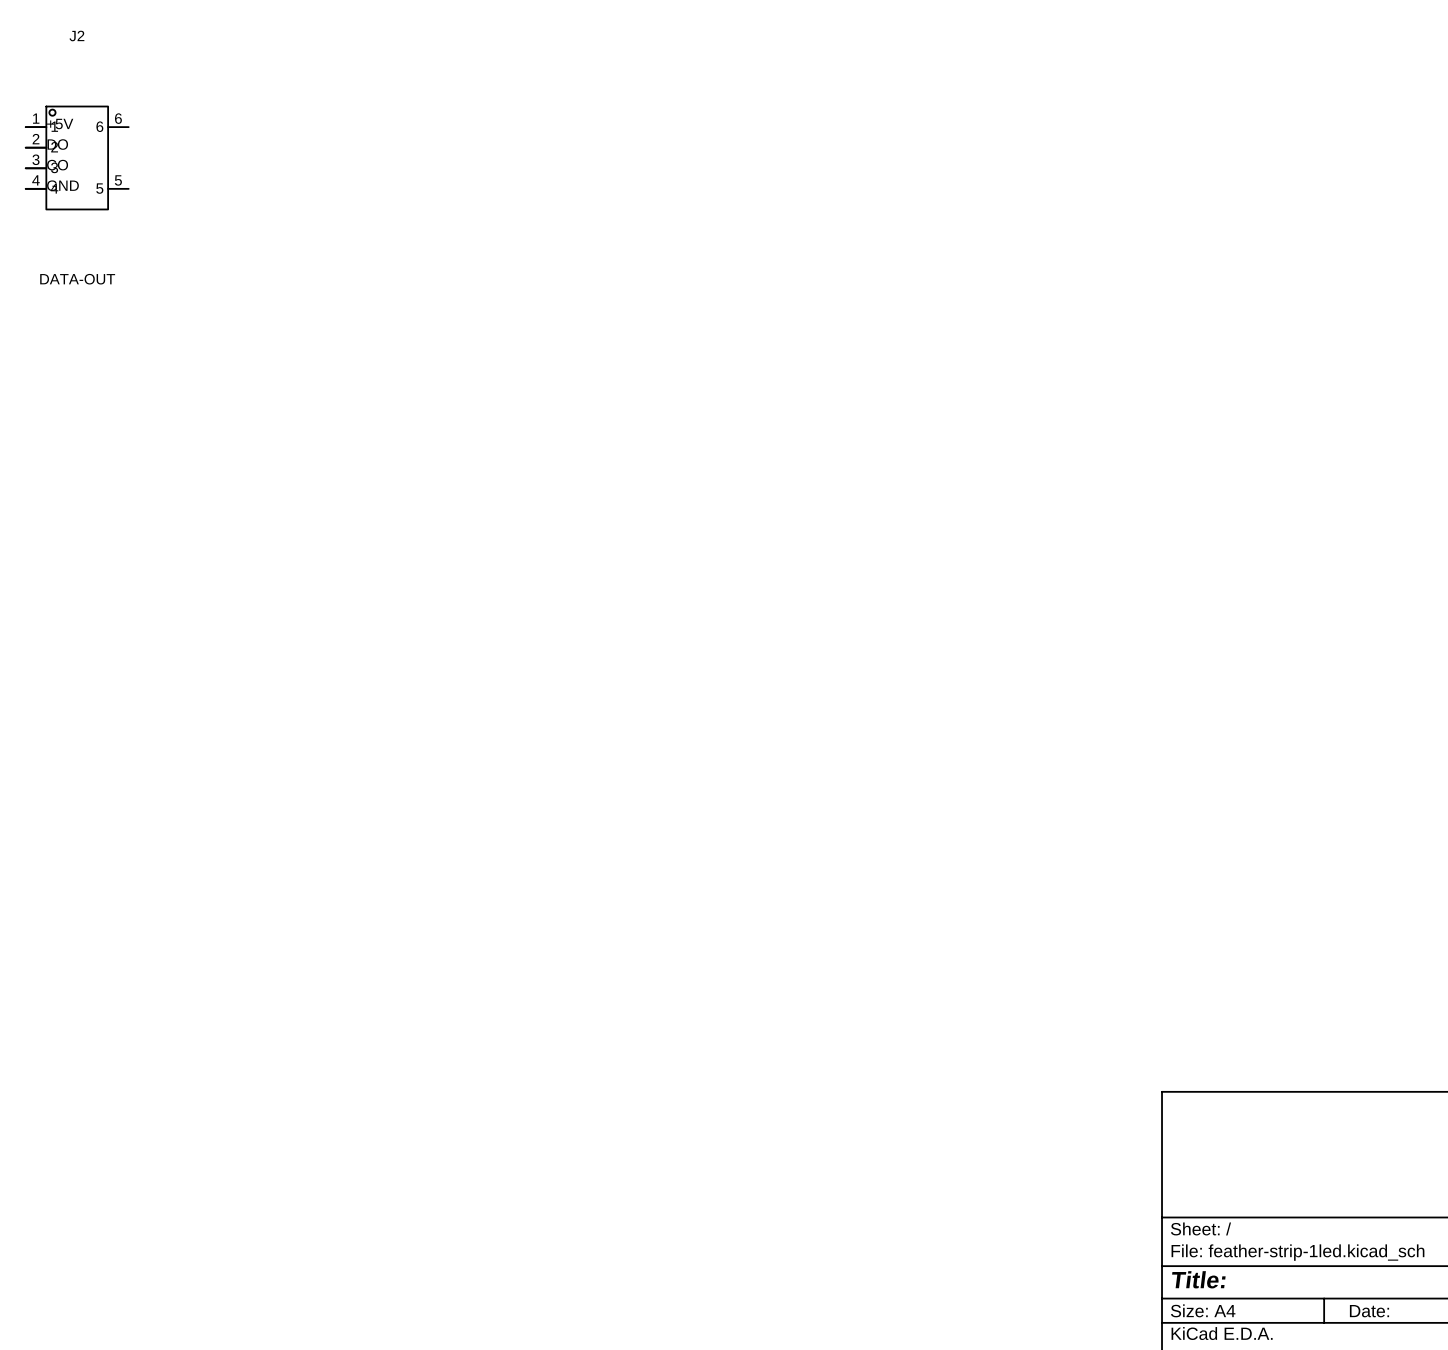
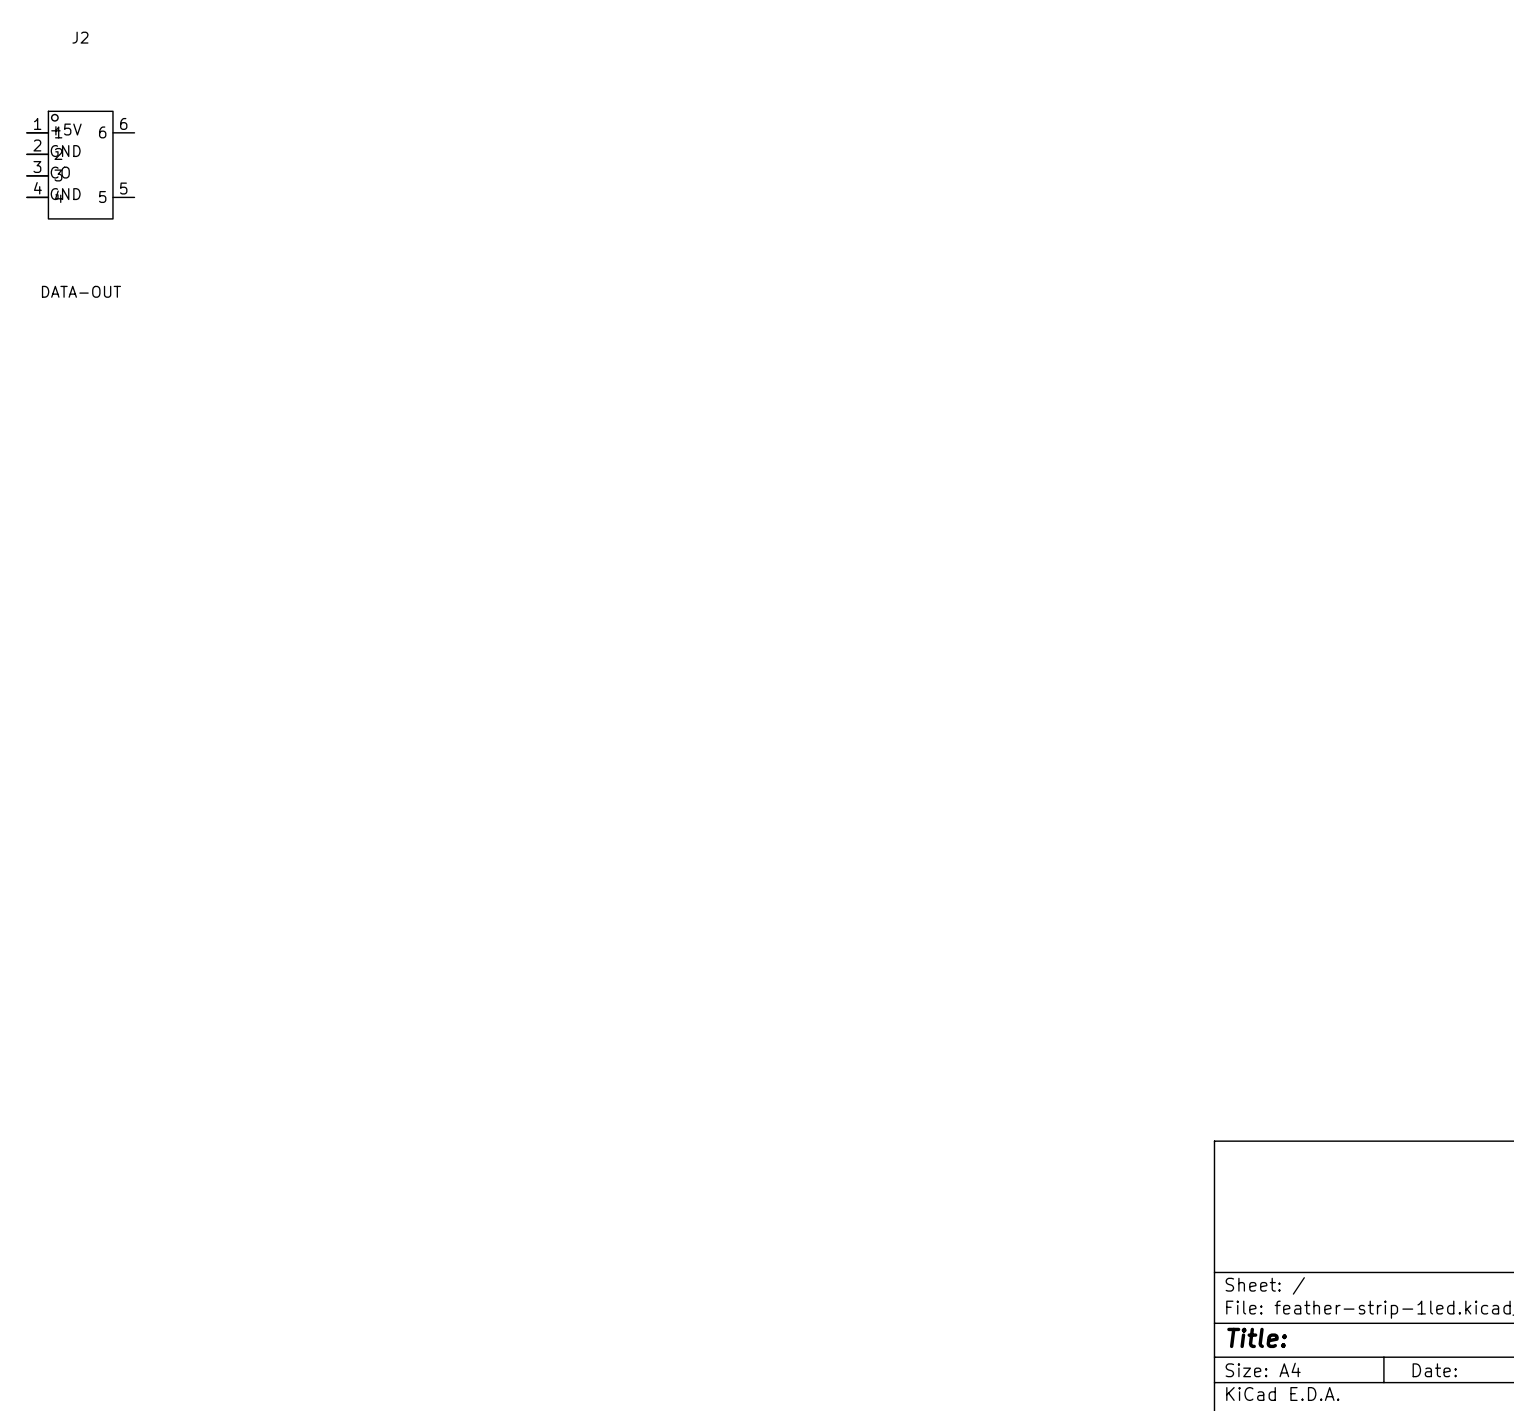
label: DO (57, 144) -> GND (65, 151)

